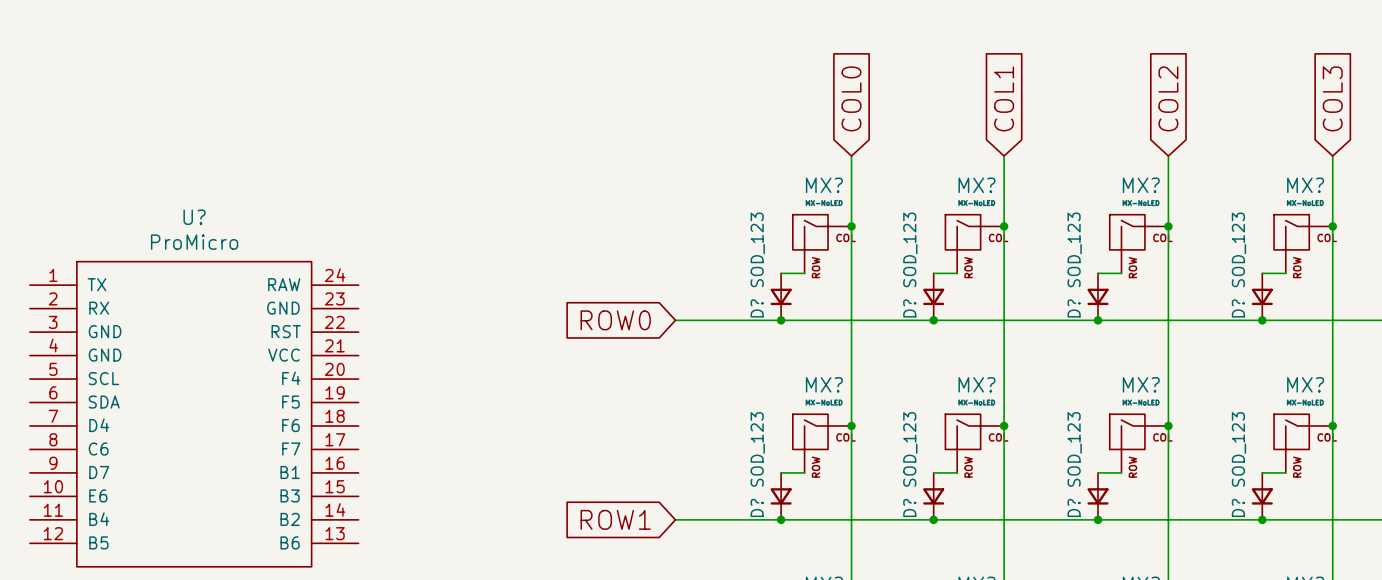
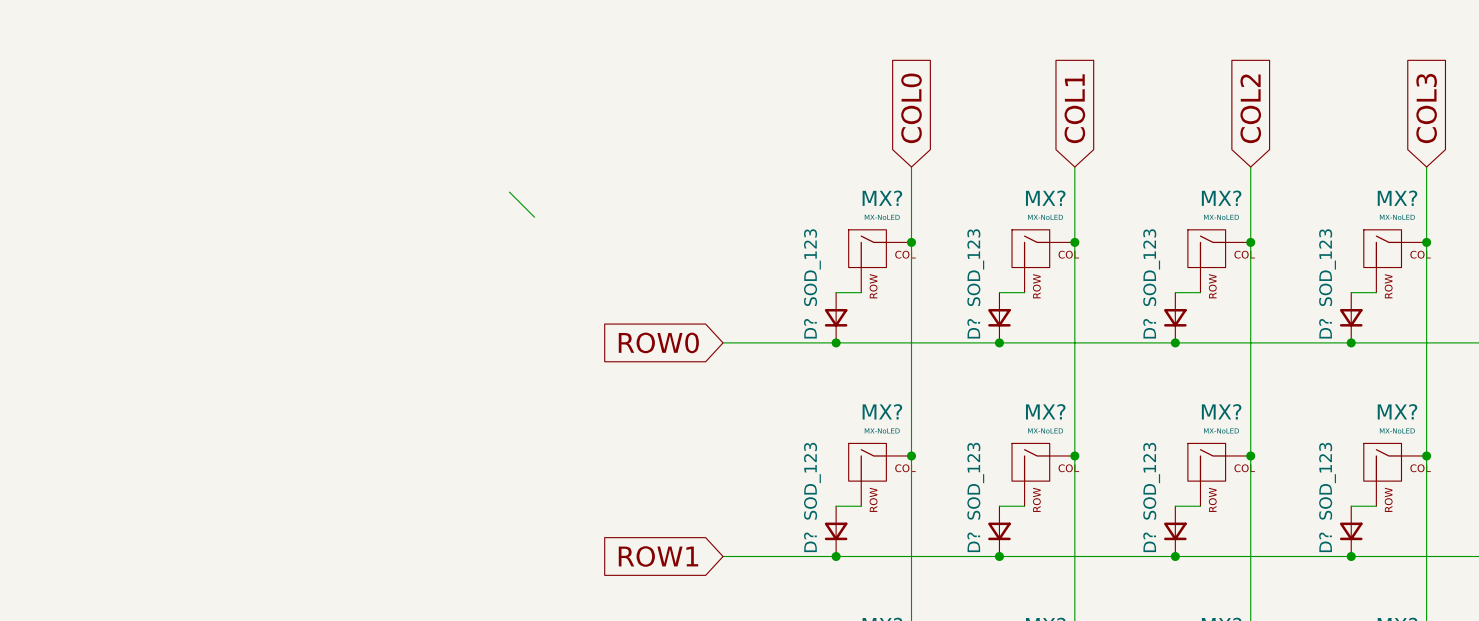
wire: none -> (509, 192) (534, 217)
U?: ProMicro (194, 414) -> none

